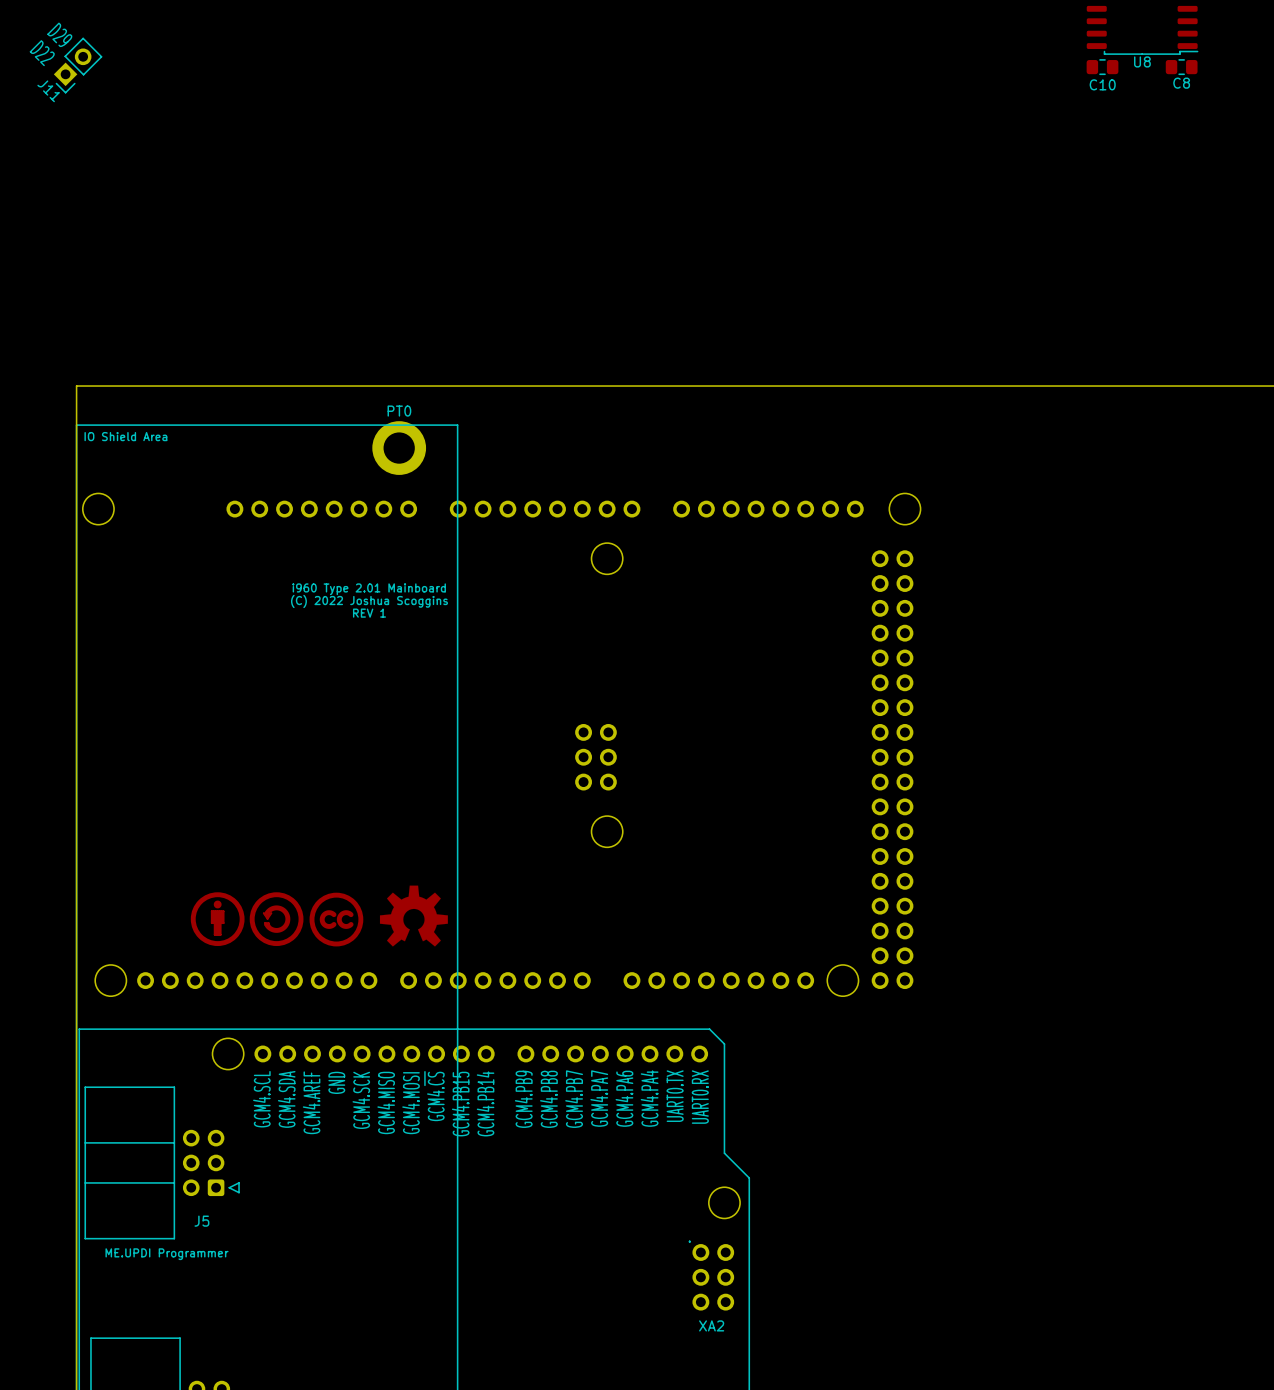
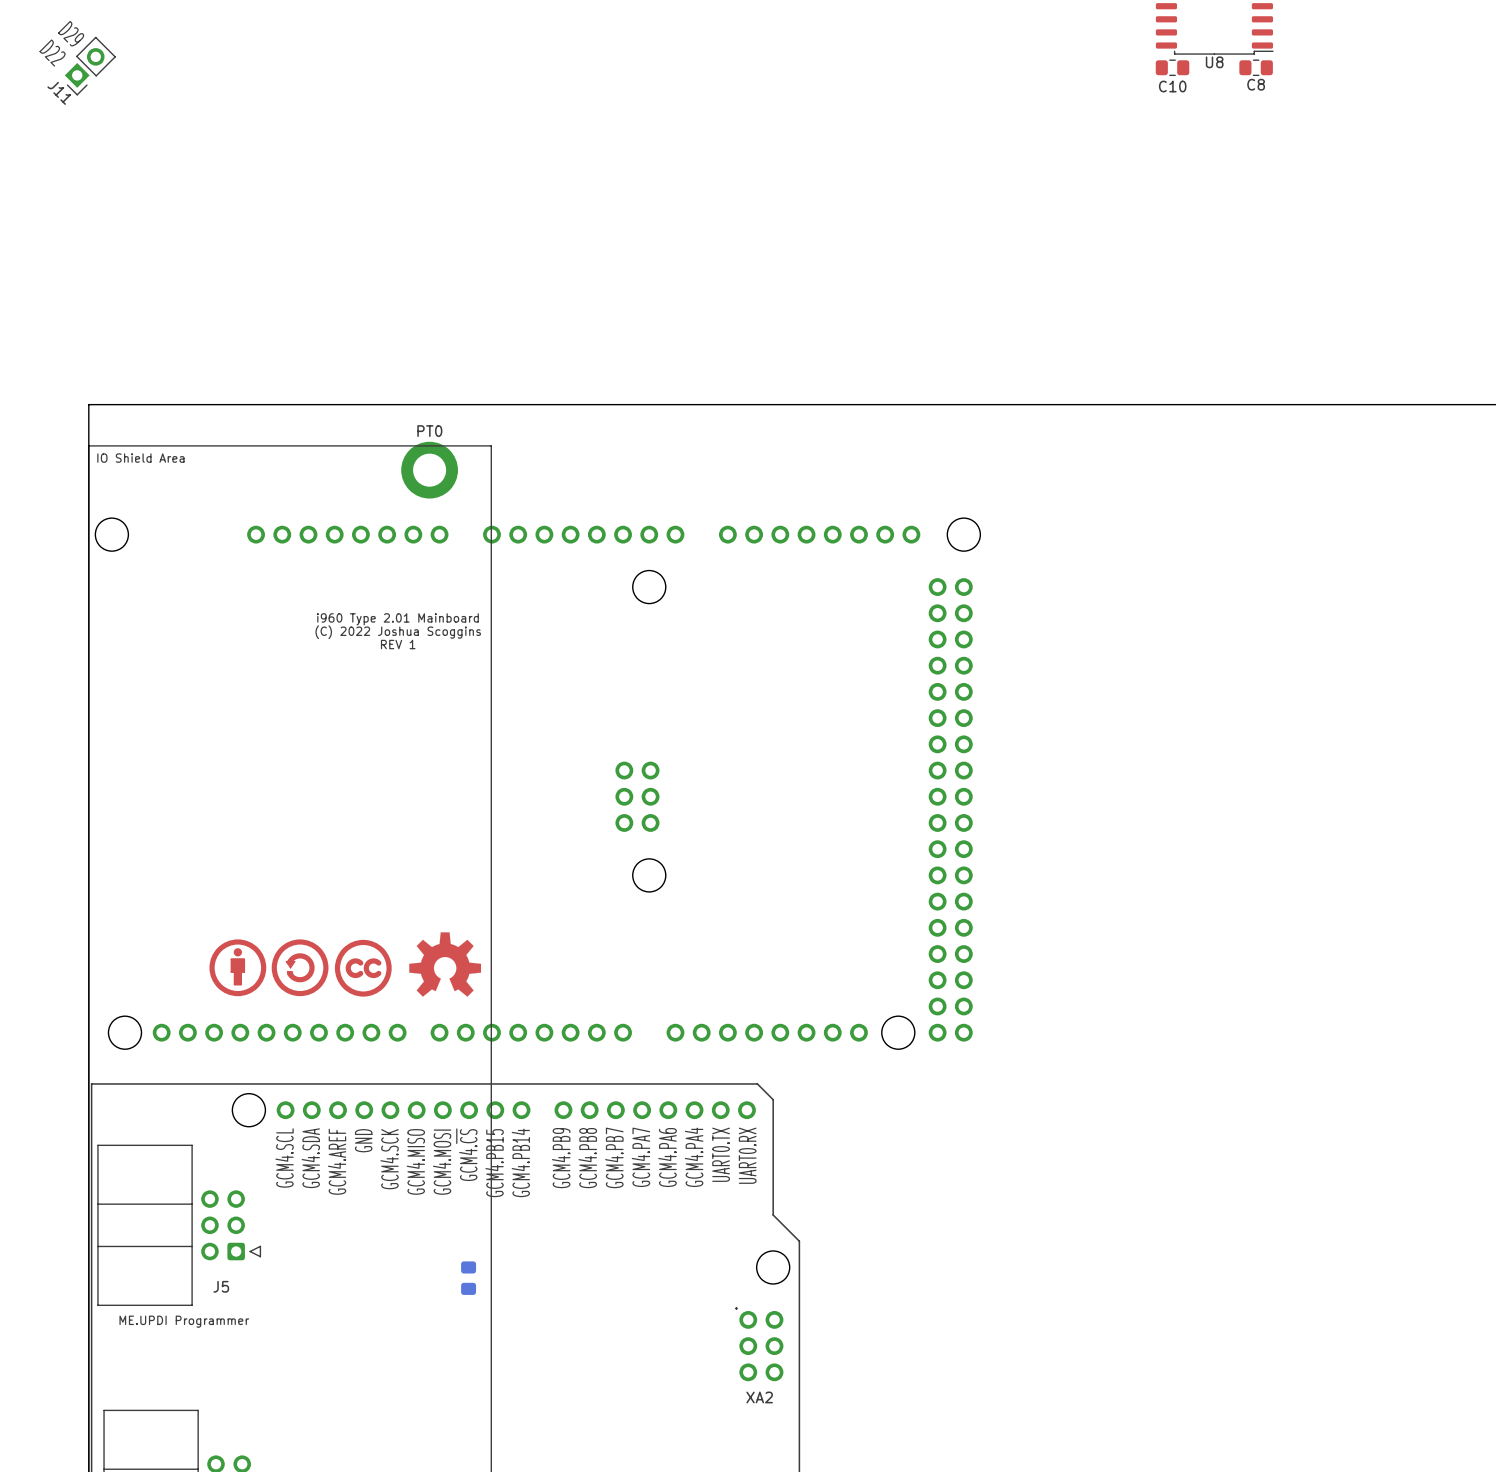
part: none -> (468, 1278)

